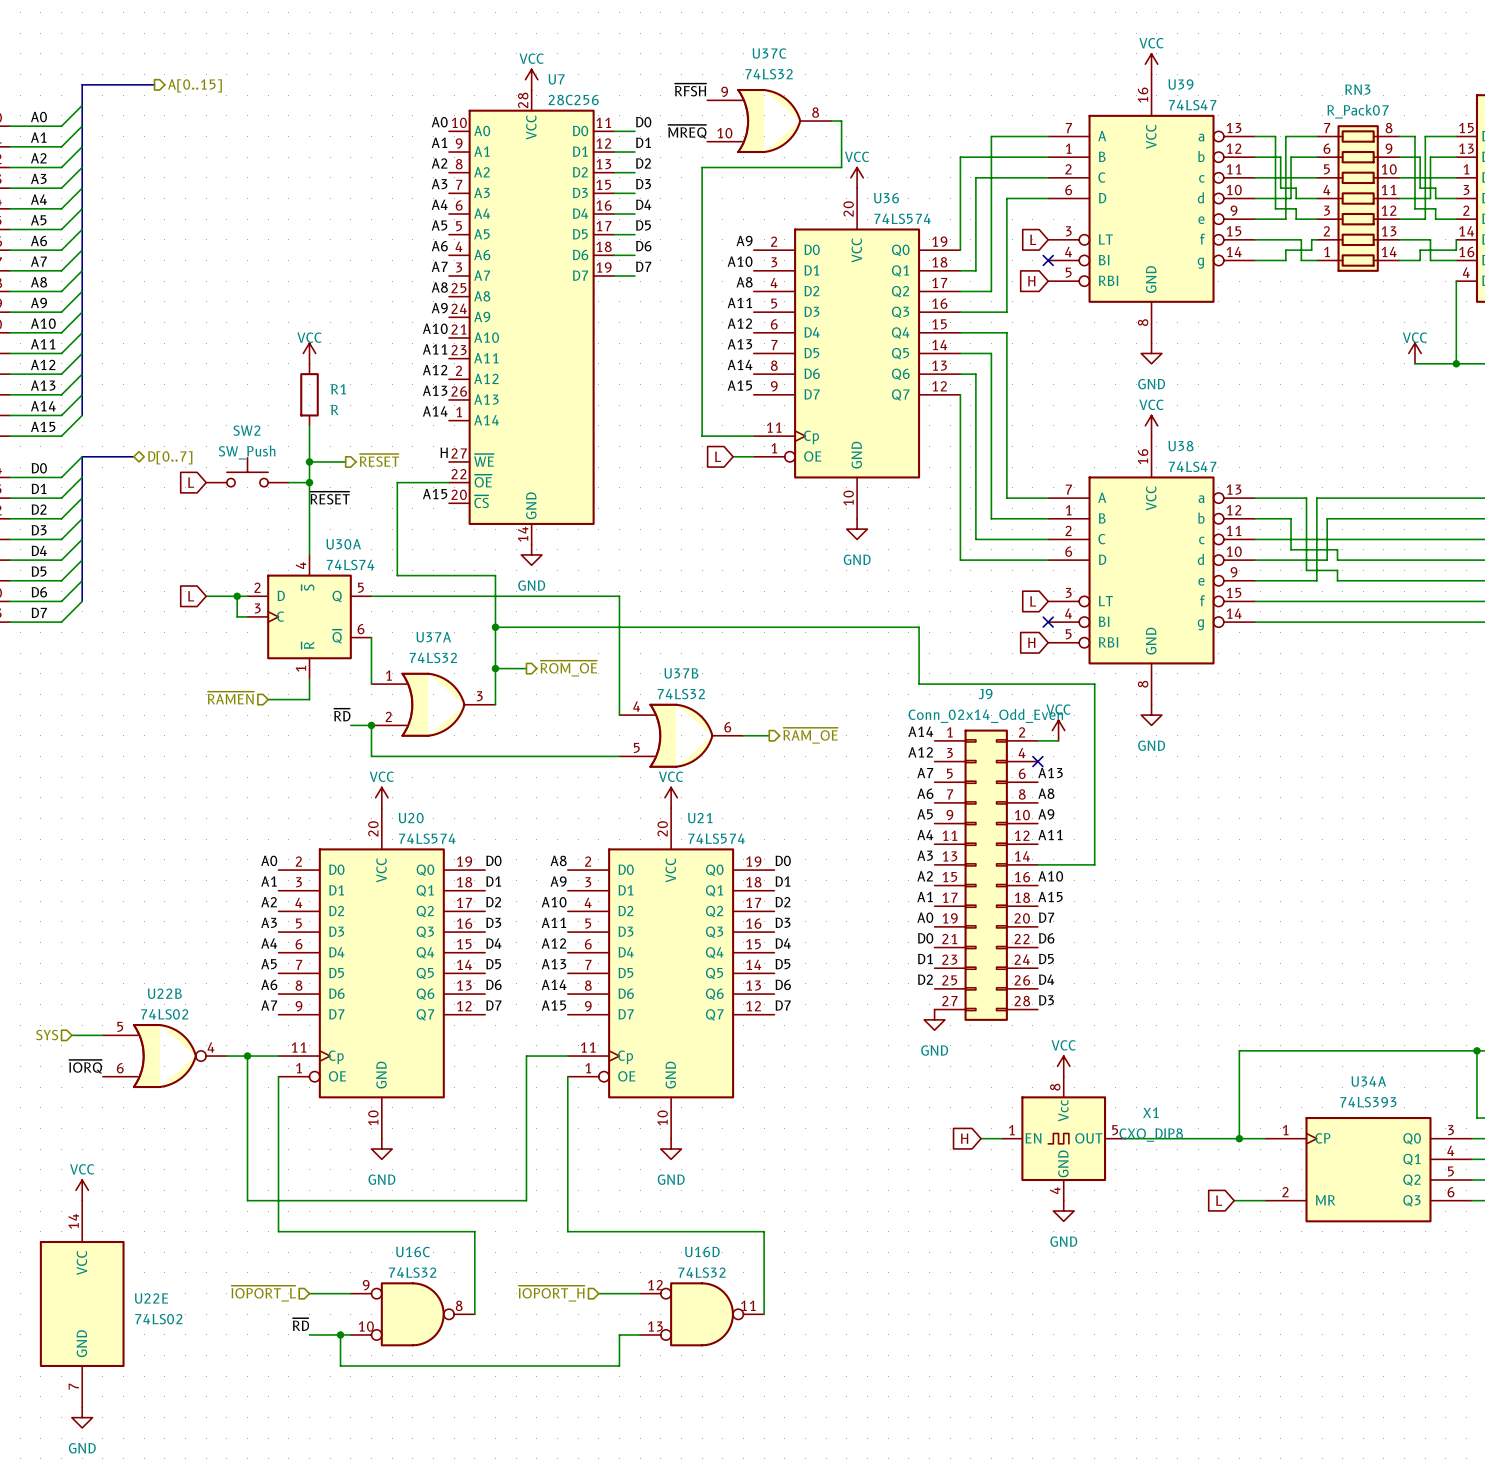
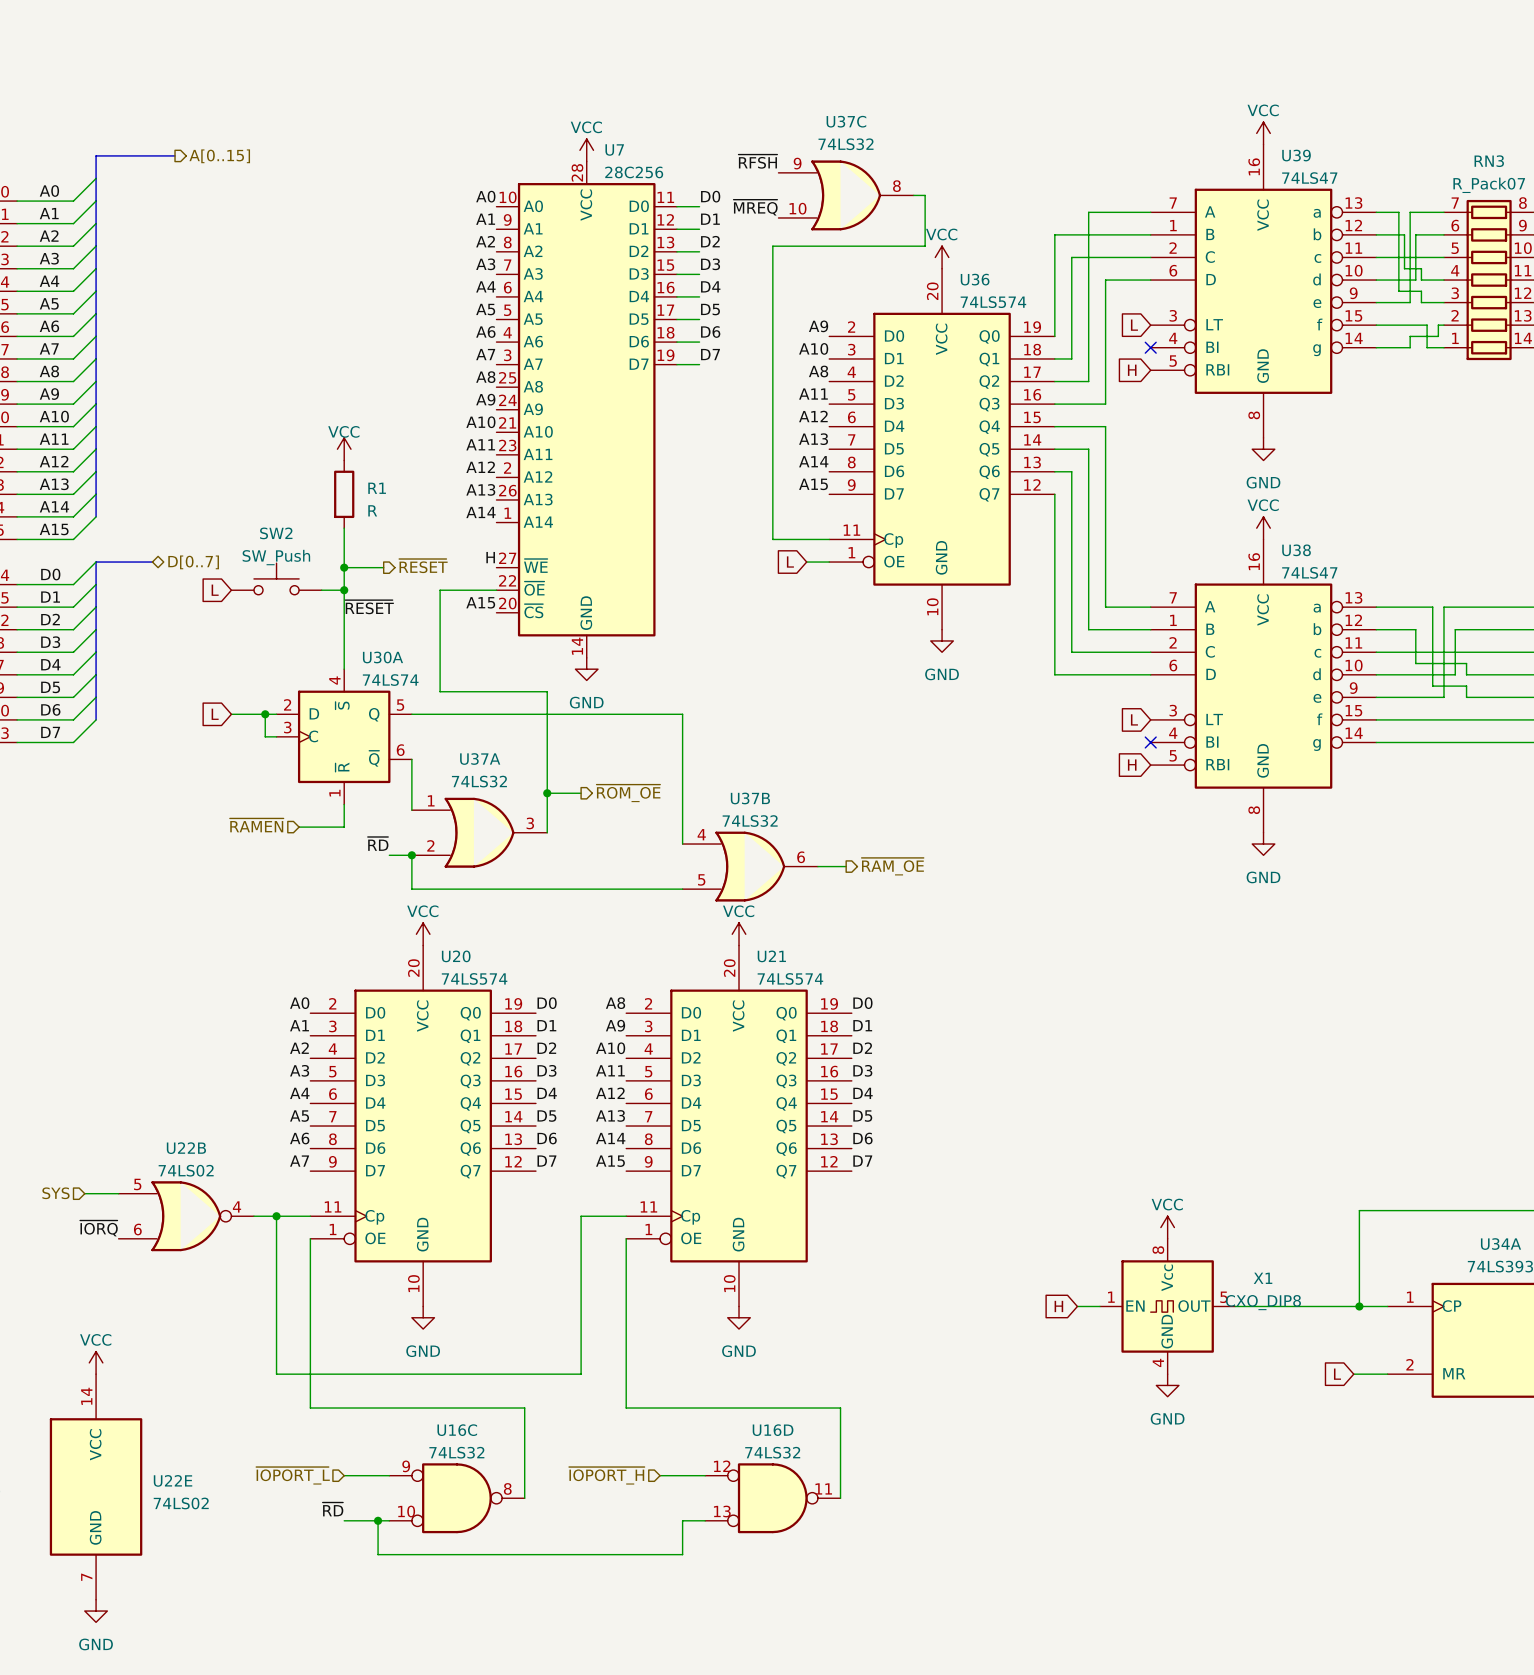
wire: (495, 627) (919, 627) (919, 684) (1094, 684) (1094, 864) (1037, 864) -> none
junction: (495, 627) -> none
power symbol: VCC (1058, 730) -> none
label: A14 (920, 731) -> none
wire: (1037, 740) (1058, 740) -> none
label: A12 (920, 752) -> none
no-connect mark: (1037, 761) -> none
label: A7 (925, 773) -> none
label: A13 (1050, 773) -> none
label: A6 (925, 793) -> none
label: A8 (1046, 793) -> none
label: A5 (925, 814) -> none
label: A9 (1046, 814) -> none
label: A4 (925, 835) -> none
label: A11 (1050, 835) -> none
label: A3 (925, 855) -> none
J9: Conn_02x14_Odd_Even (986, 875) -> none
label: A2 (925, 876) -> none
label: A10 (1050, 876) -> none
label: A1 (925, 897) -> none
label: A15 (1050, 897) -> none
label: A0 (925, 917) -> none
label: D7 (1046, 917) -> none
label: D0 (925, 938) -> none
label: D6 (1046, 938) -> none
label: D1 (925, 958) -> none
label: D5 (1046, 959) -> none
label: D2 (925, 979) -> none
label: D4 (1046, 979) -> none
label: D3 (1046, 1000) -> none
power symbol: GND (934, 1019) -> none

